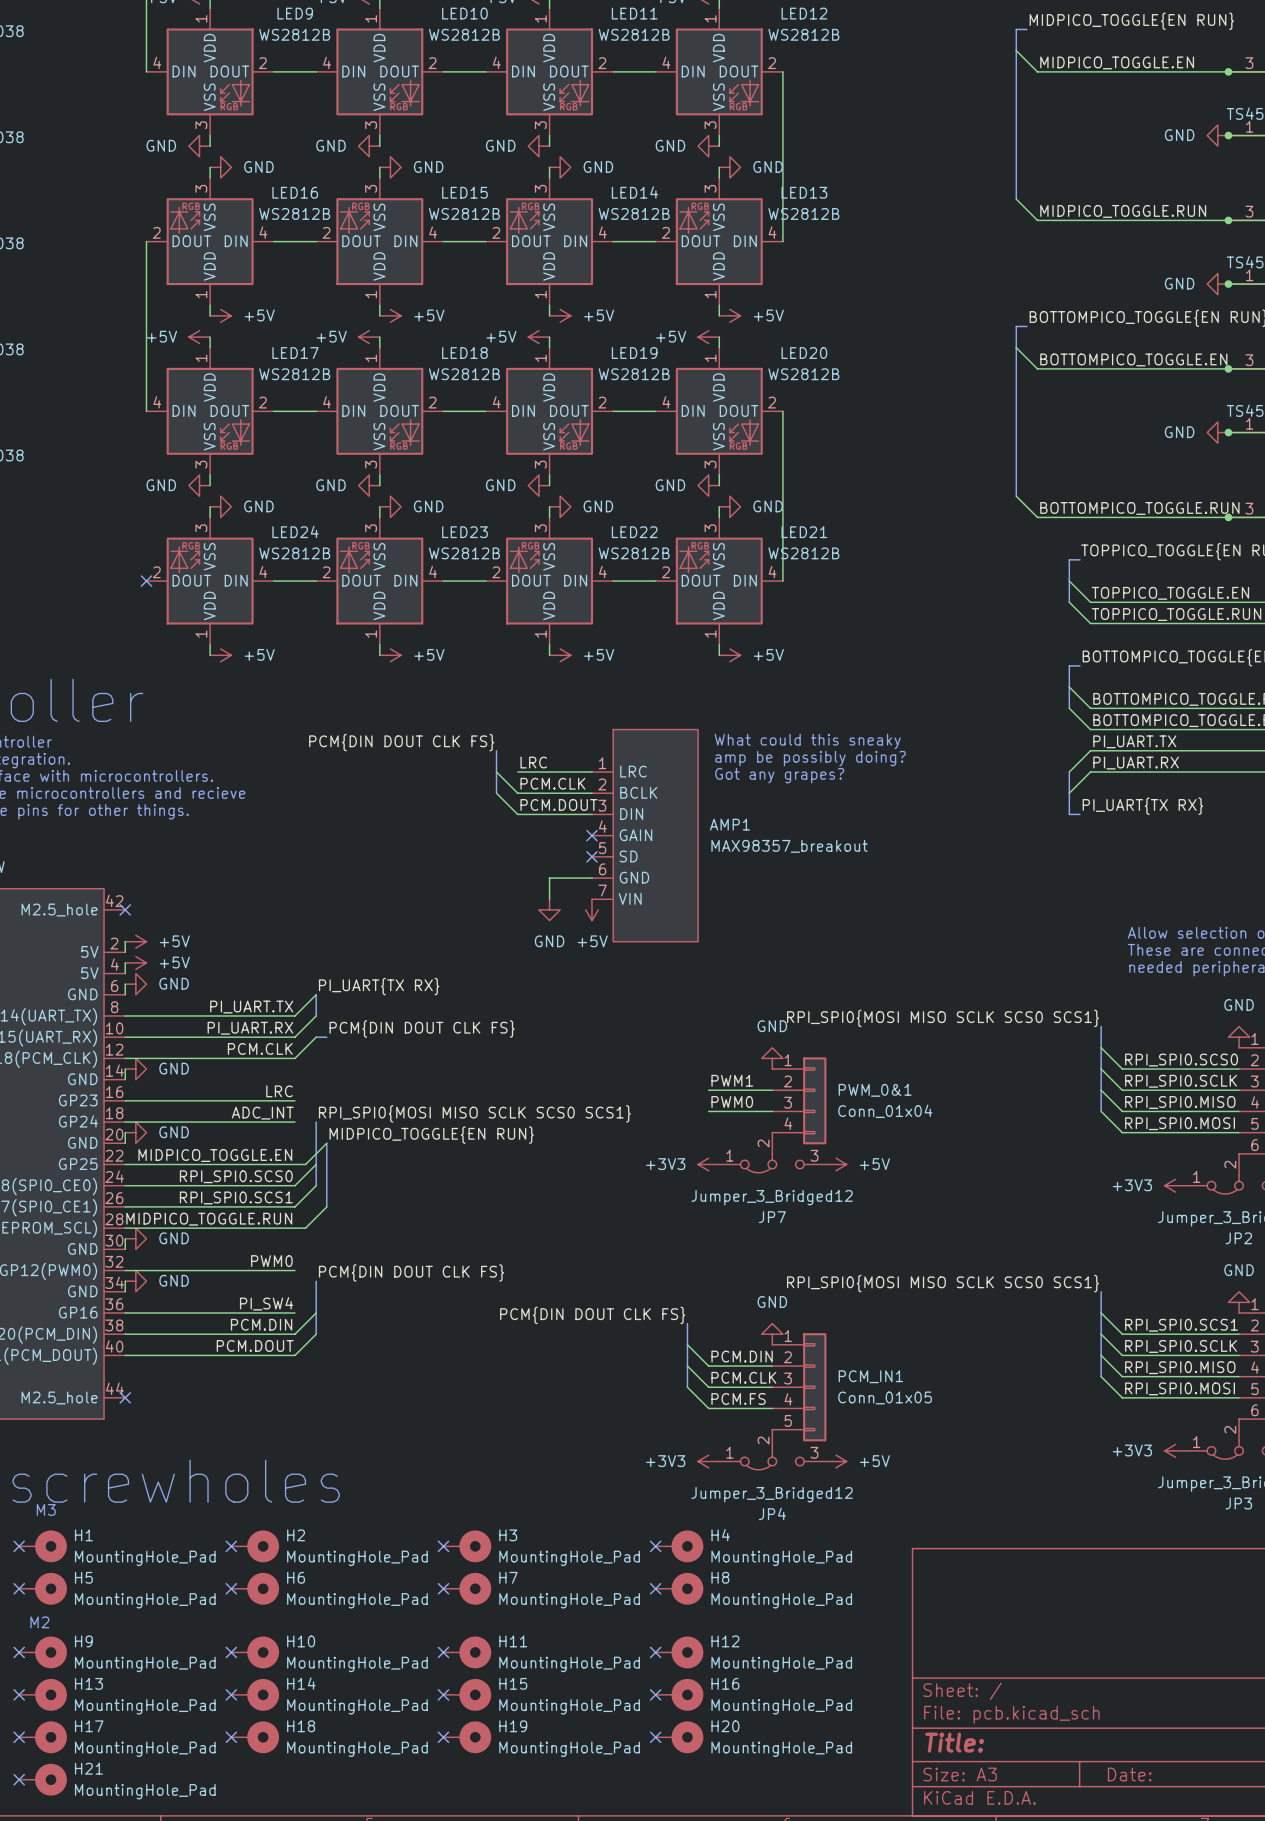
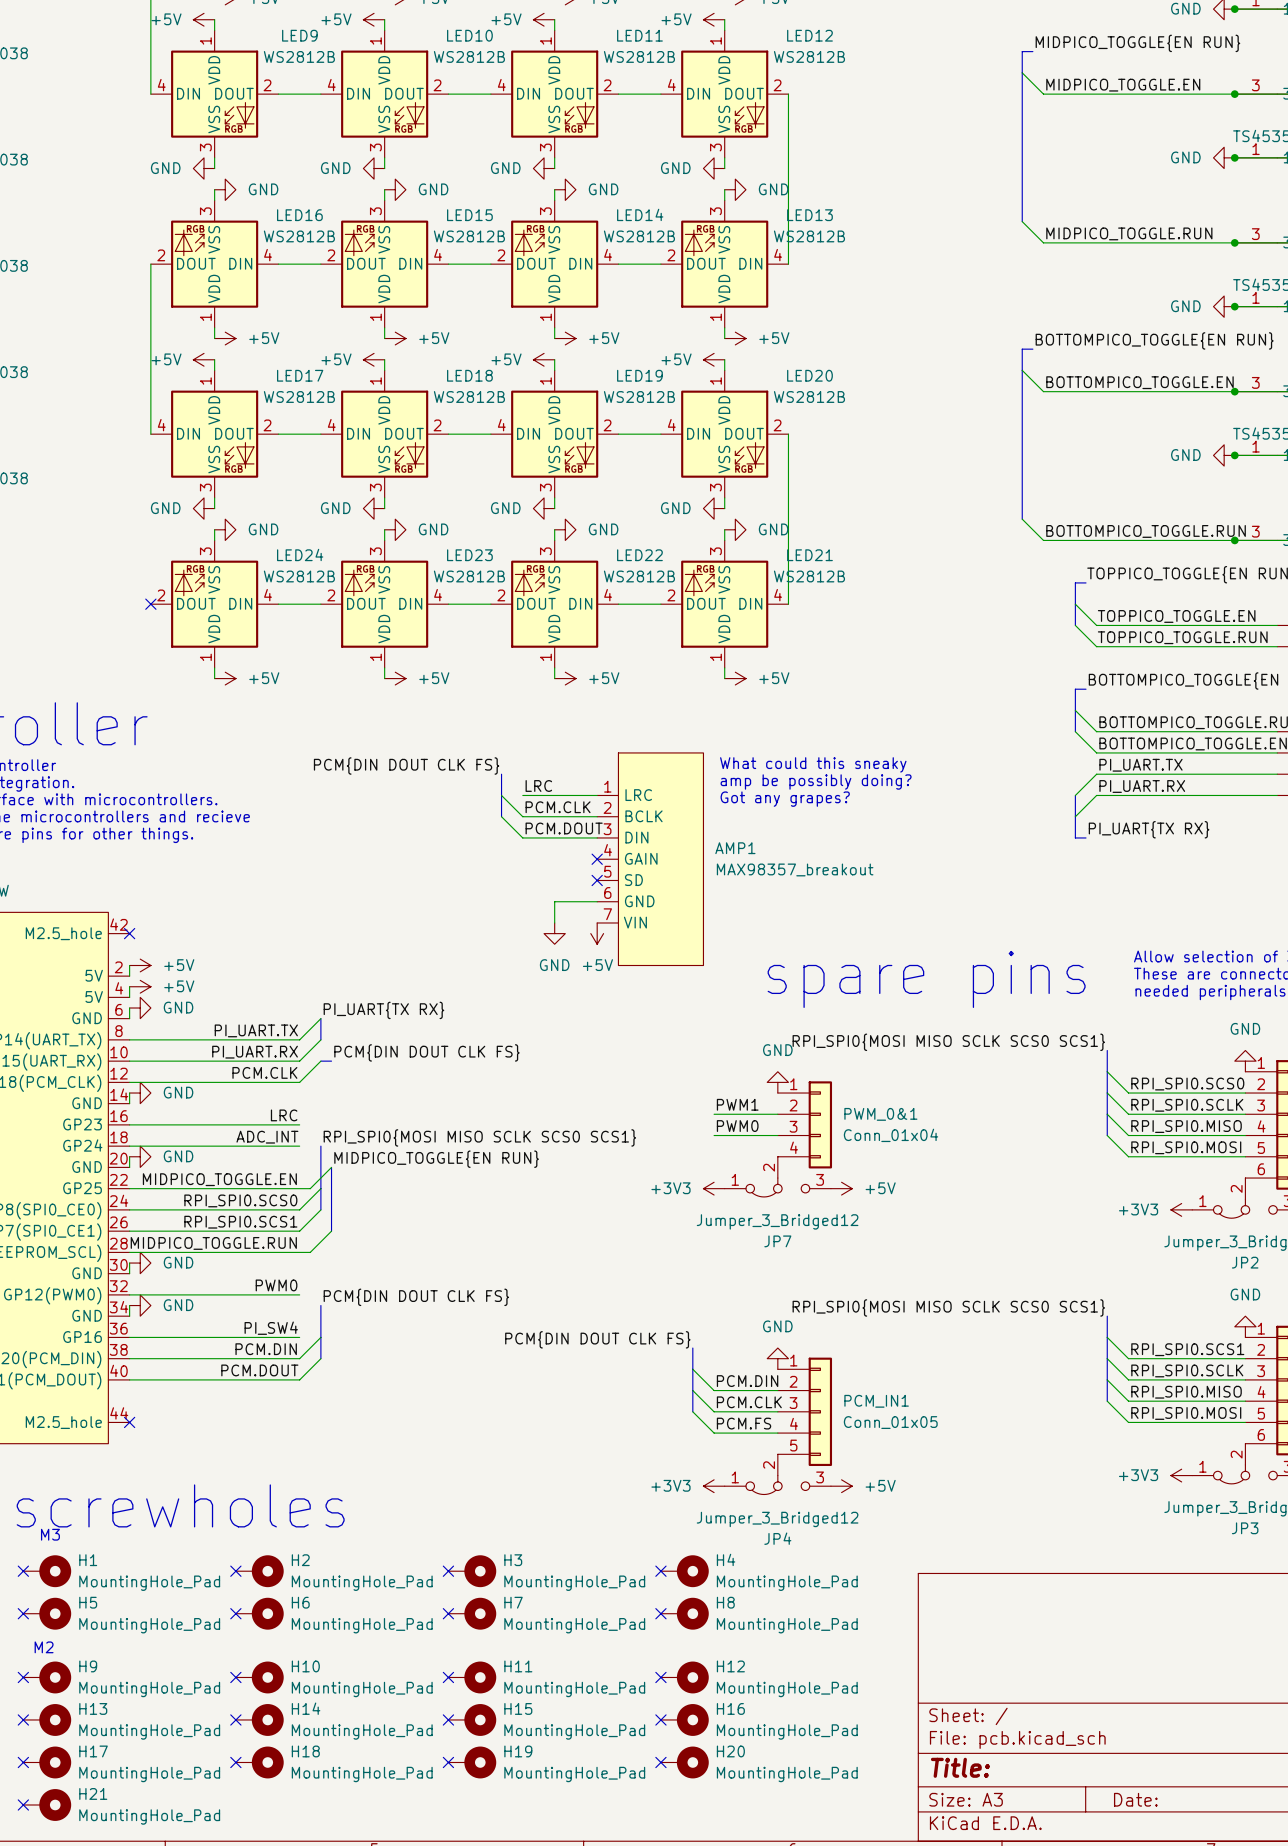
text: none -> spare pins (926, 979)

